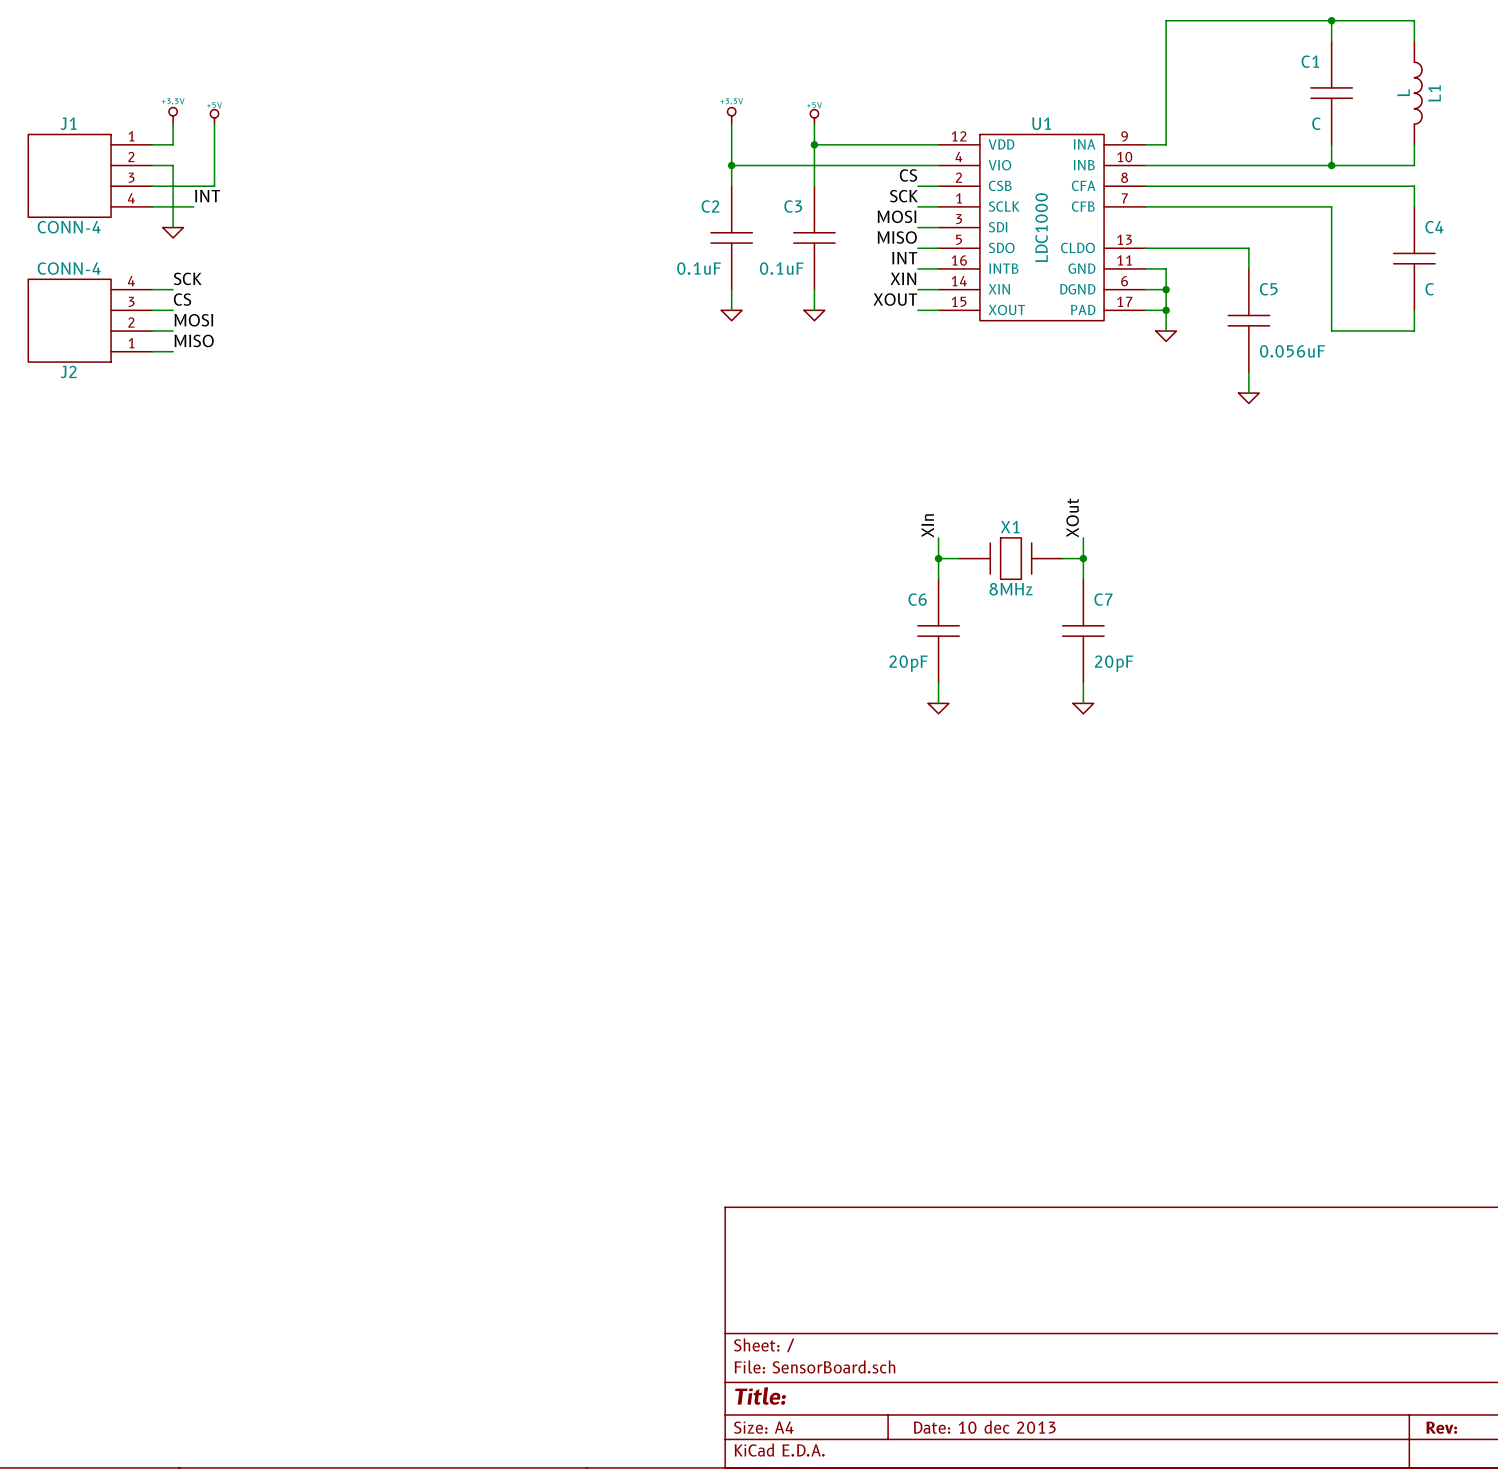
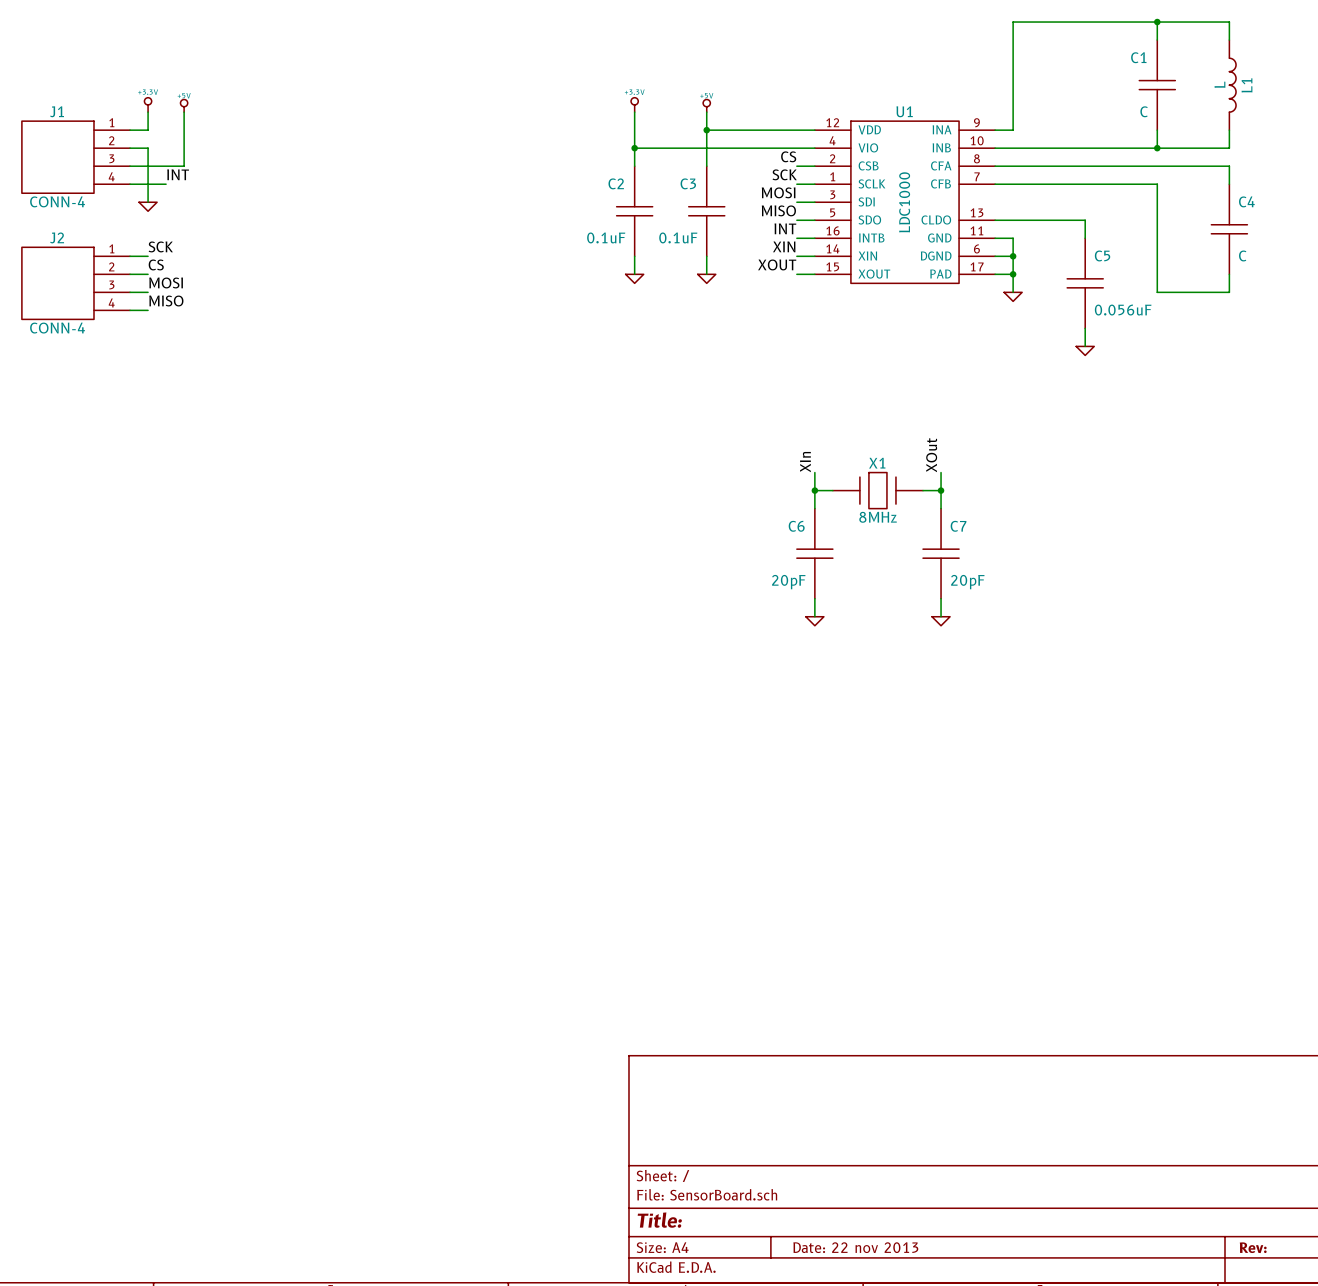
J2 flip: as is (69, 320) -> up-down (57, 283)
title block: Date: 10 dec 2013 (984, 1427) -> Date: 22 nov 2013 (855, 1247)

